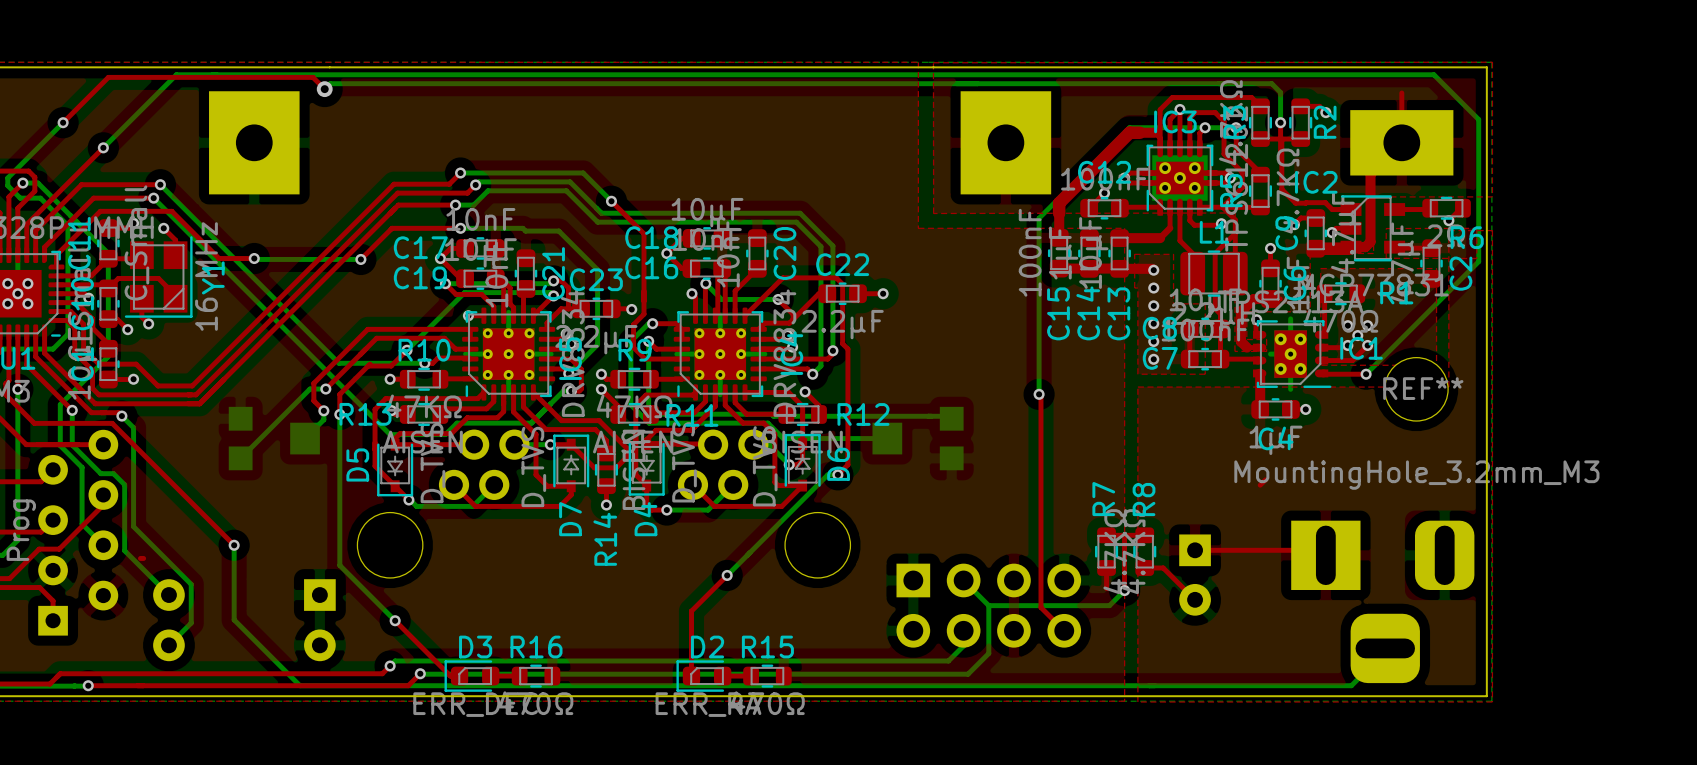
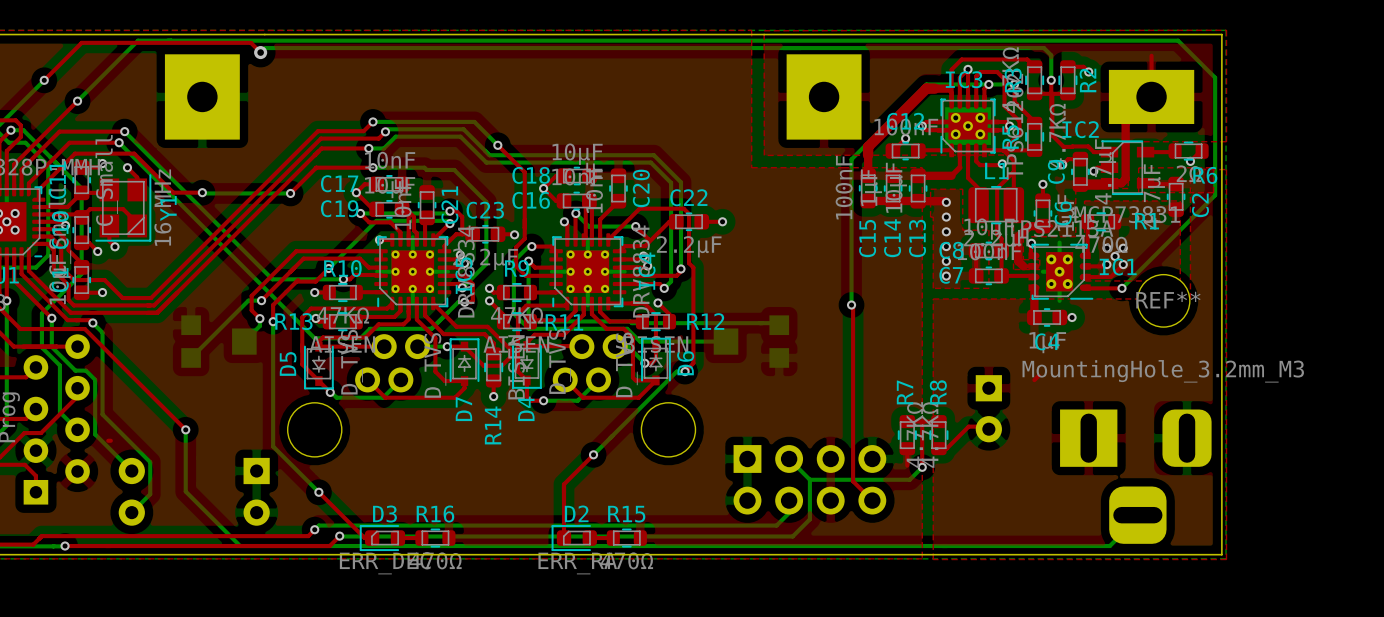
top track: (1195, 550) (1320, 550) -> none
top track: (1154, 567) (1163, 567) (1195, 599) -> (946, 448) (968, 426) (988, 426)
part position: (1195, 575) -> (988, 408)

